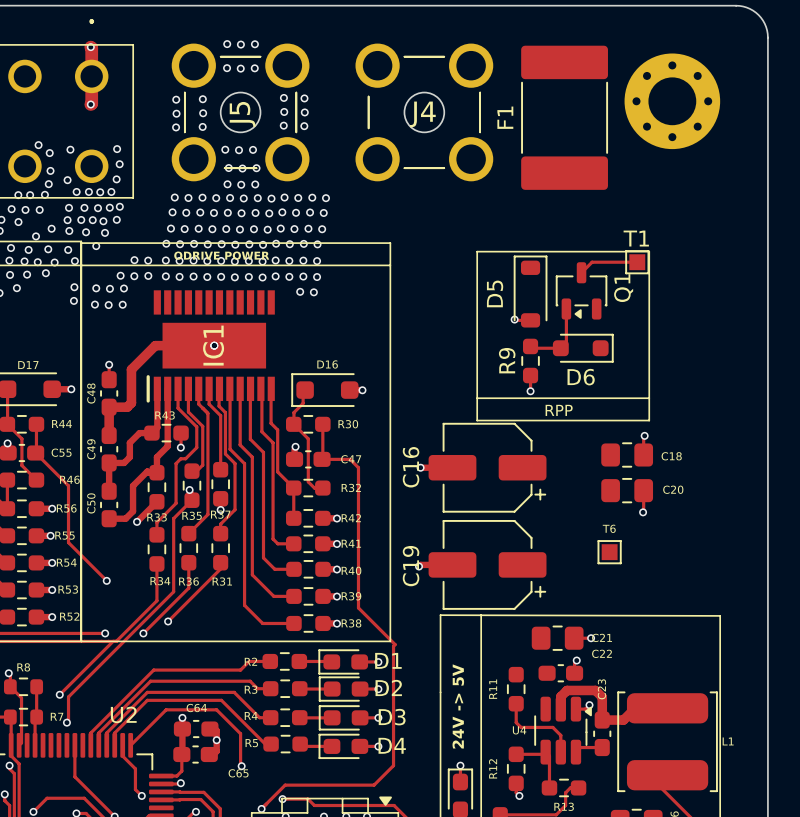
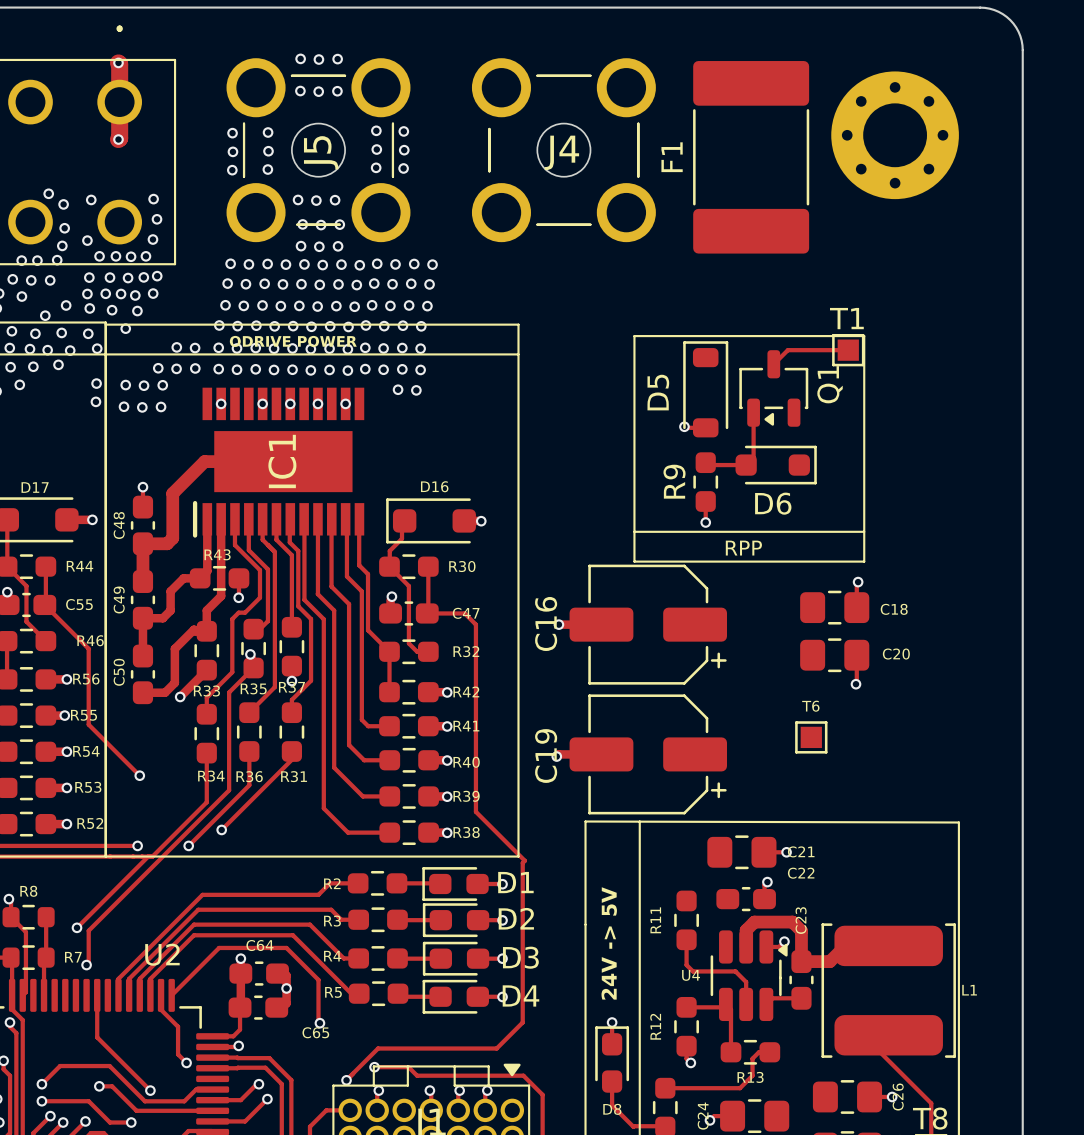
via: none -> (221, 403)
via: none -> (262, 403)
via: none -> (290, 403)
via: none -> (317, 403)
via: none -> (345, 403)
via: (214, 345) -> none

